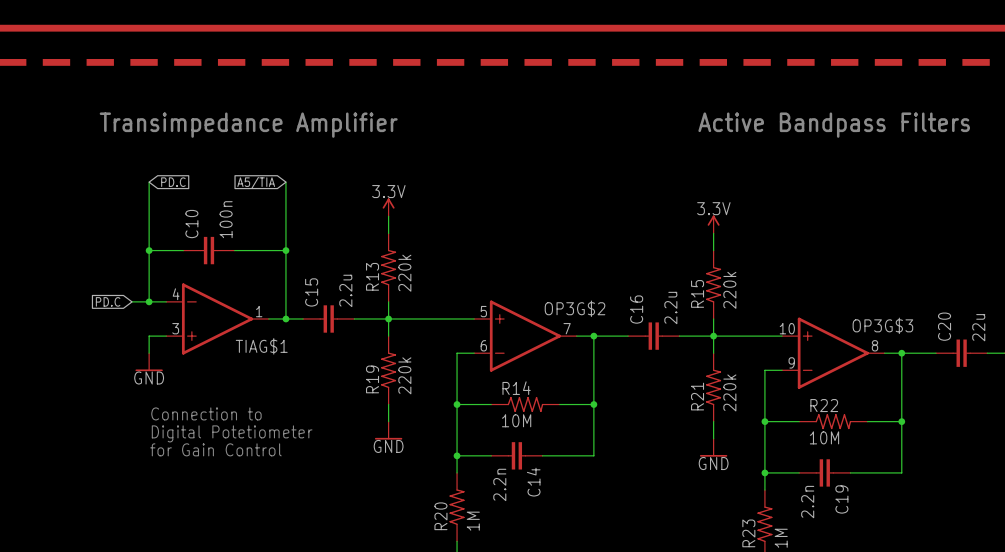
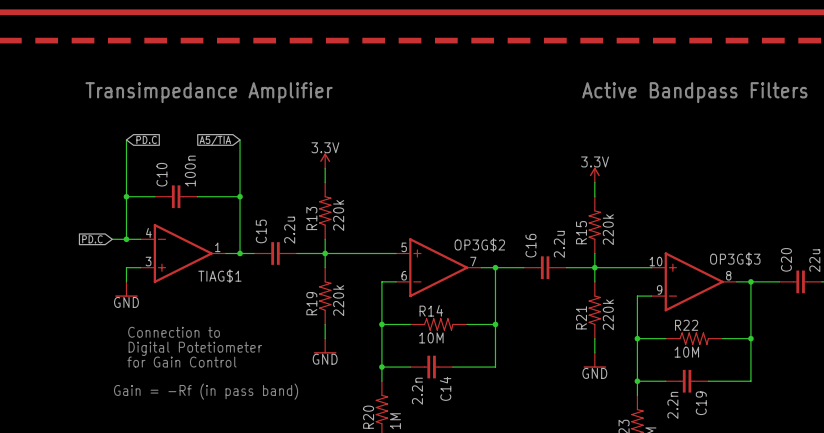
text: none -> Gain = -Rf (in pass band) (206, 391)

